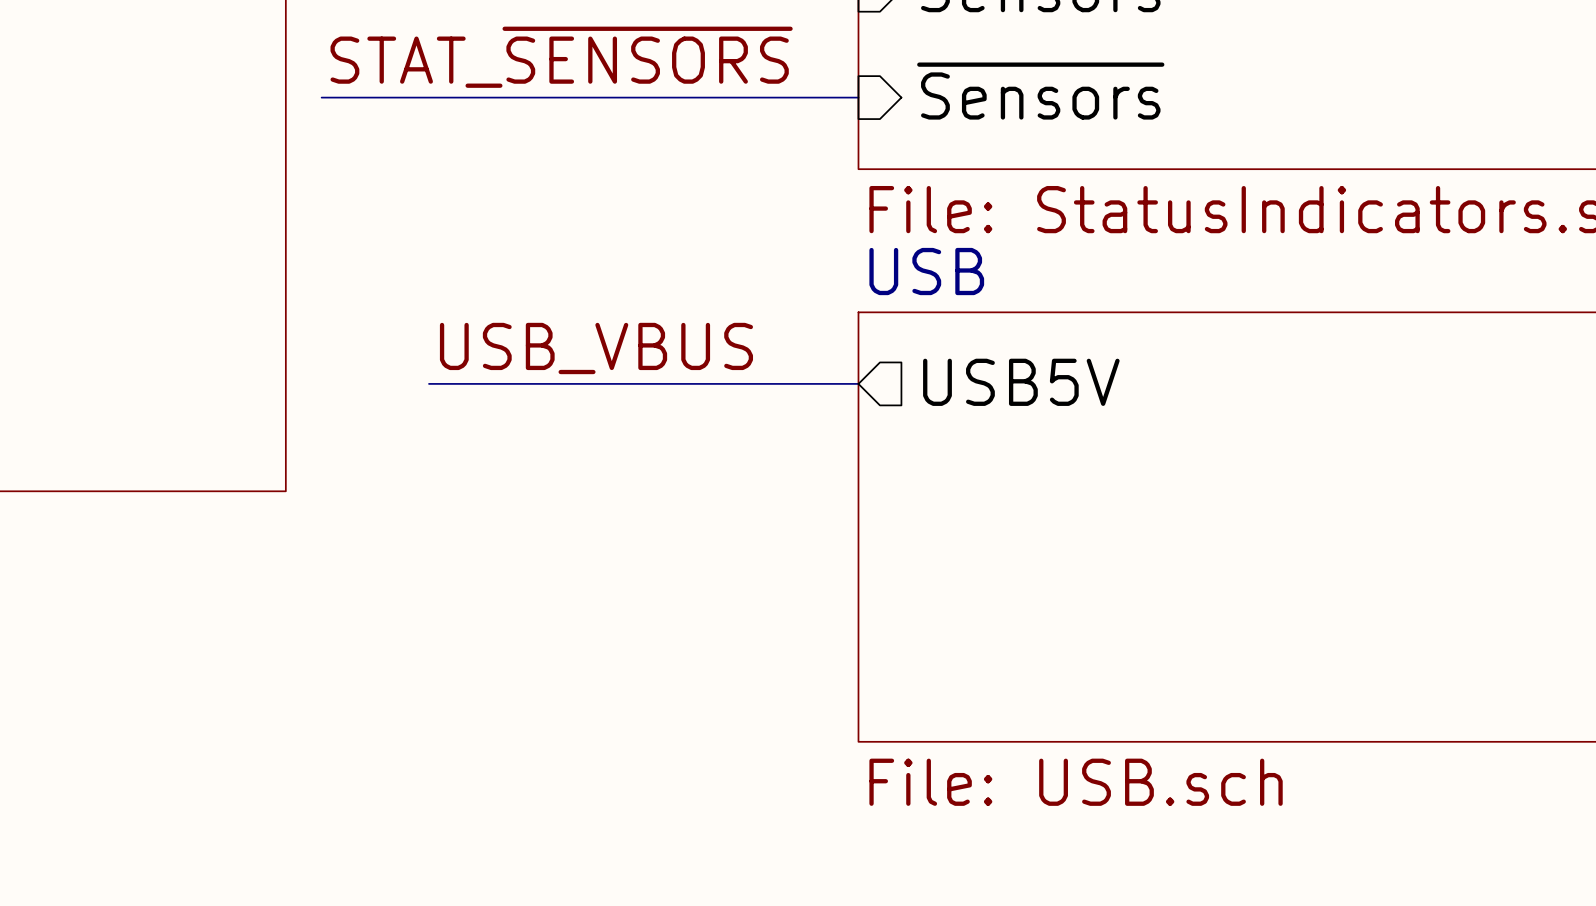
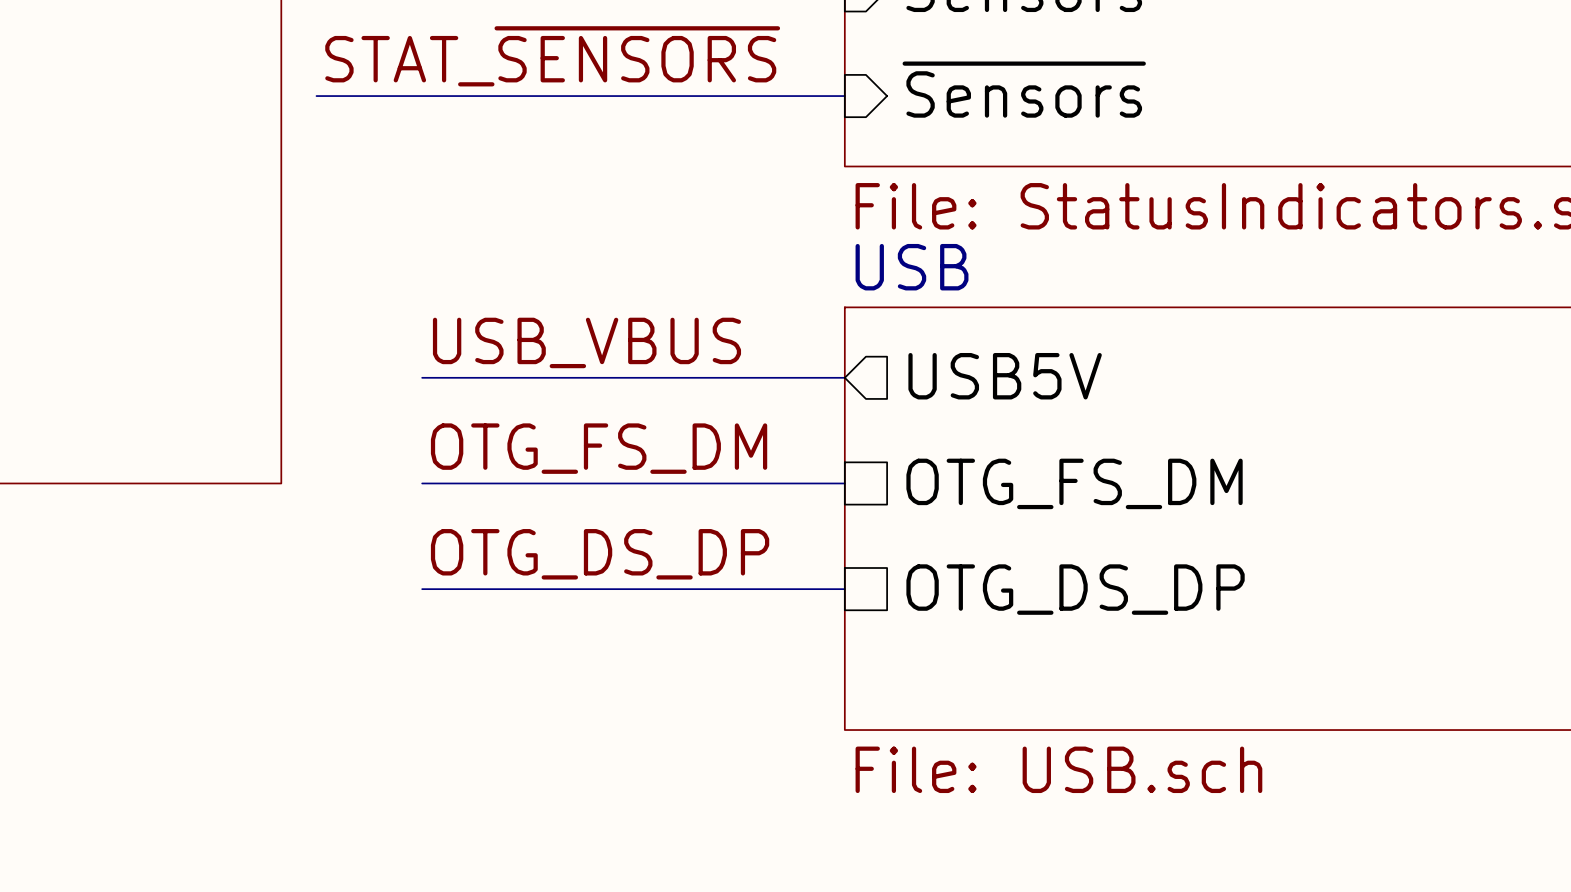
label: none -> OTG_FS_DM (599, 448)
wire: none -> (422, 483) (844, 483)
sheet pin: none -> OTG_FS_DM (1074, 483)
label: none -> OTG_DS_DP (600, 554)
wire: none -> (422, 589) (844, 589)
sheet pin: none -> OTG_DS_DP (1075, 589)

